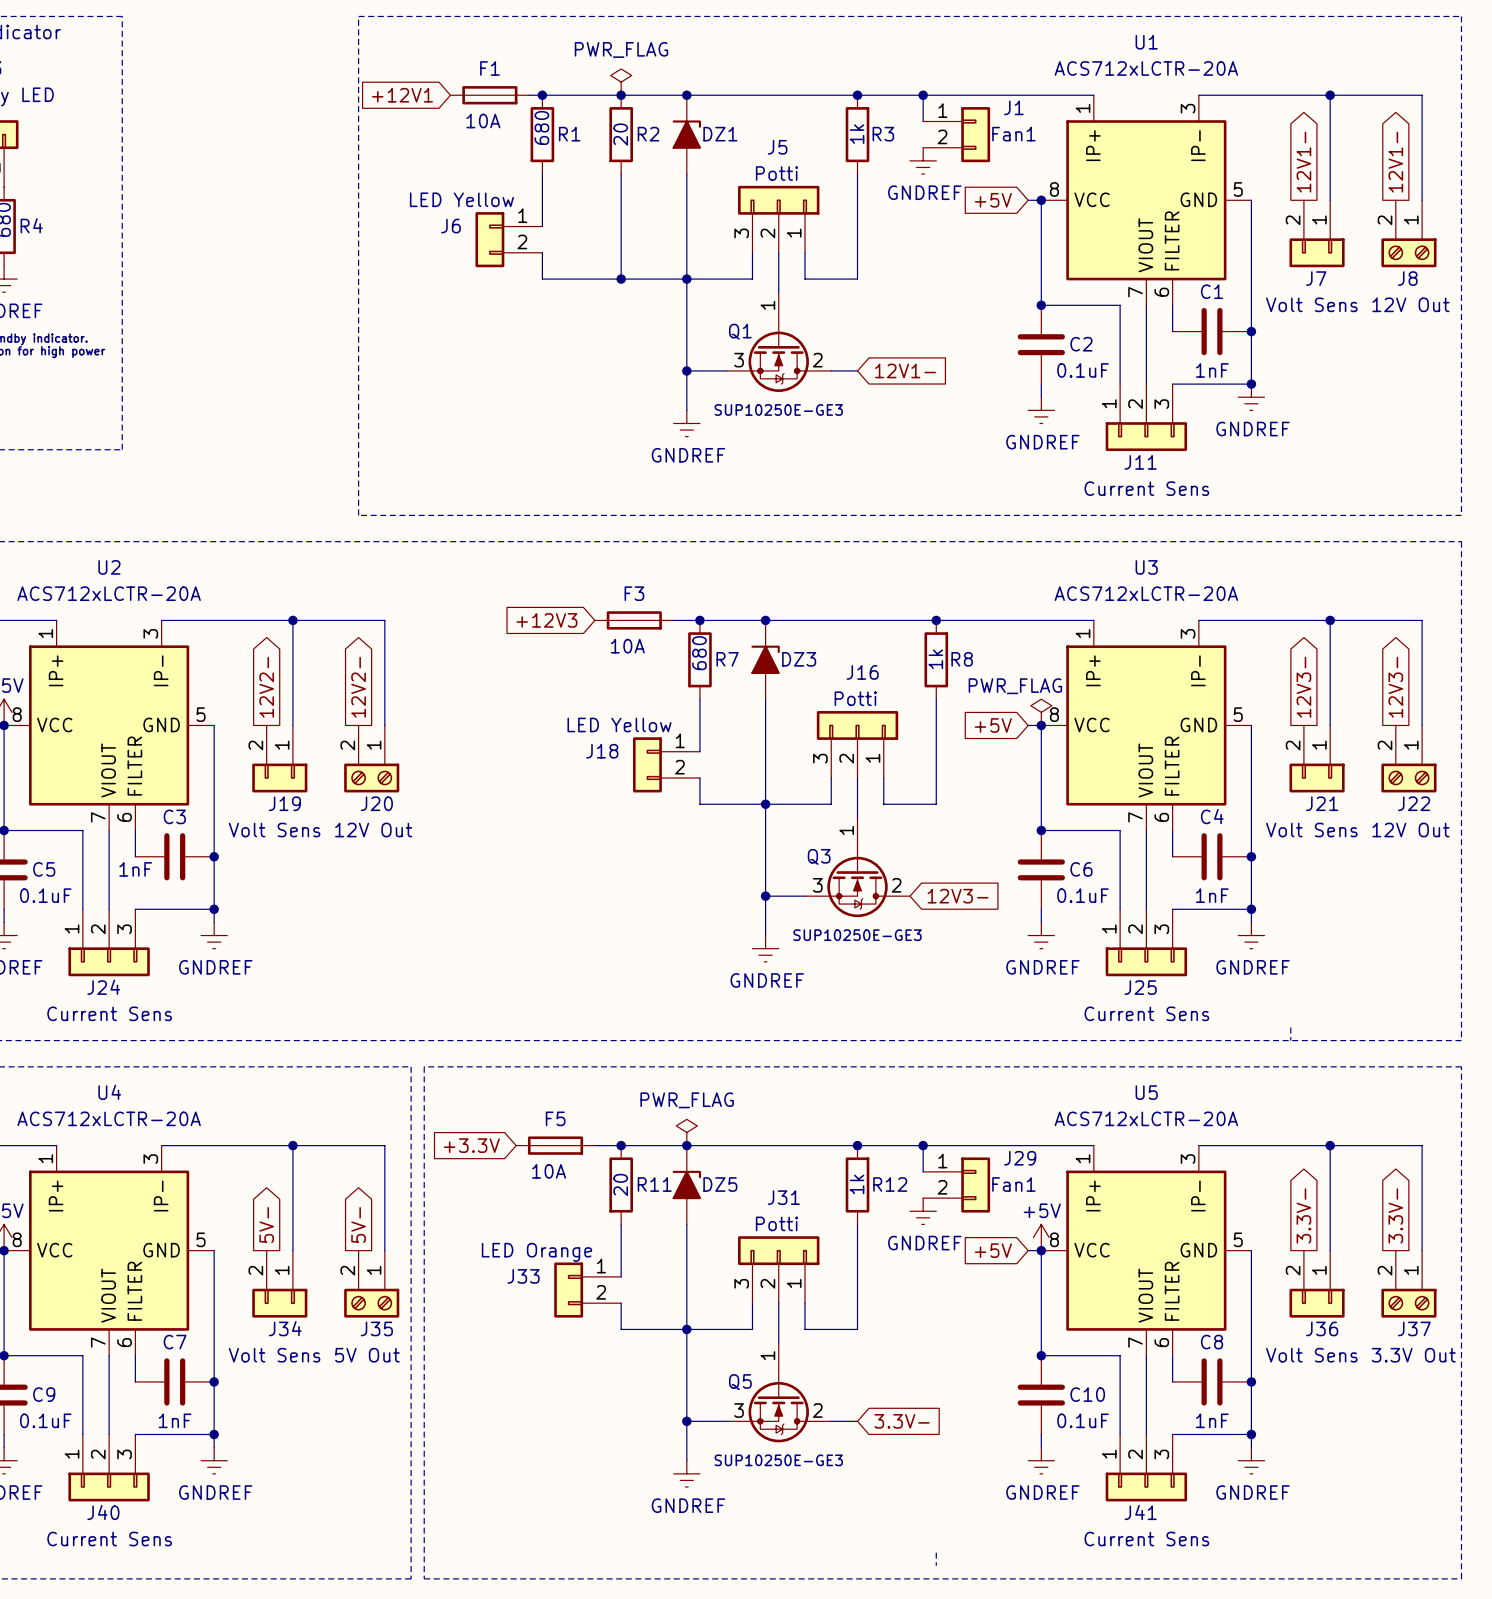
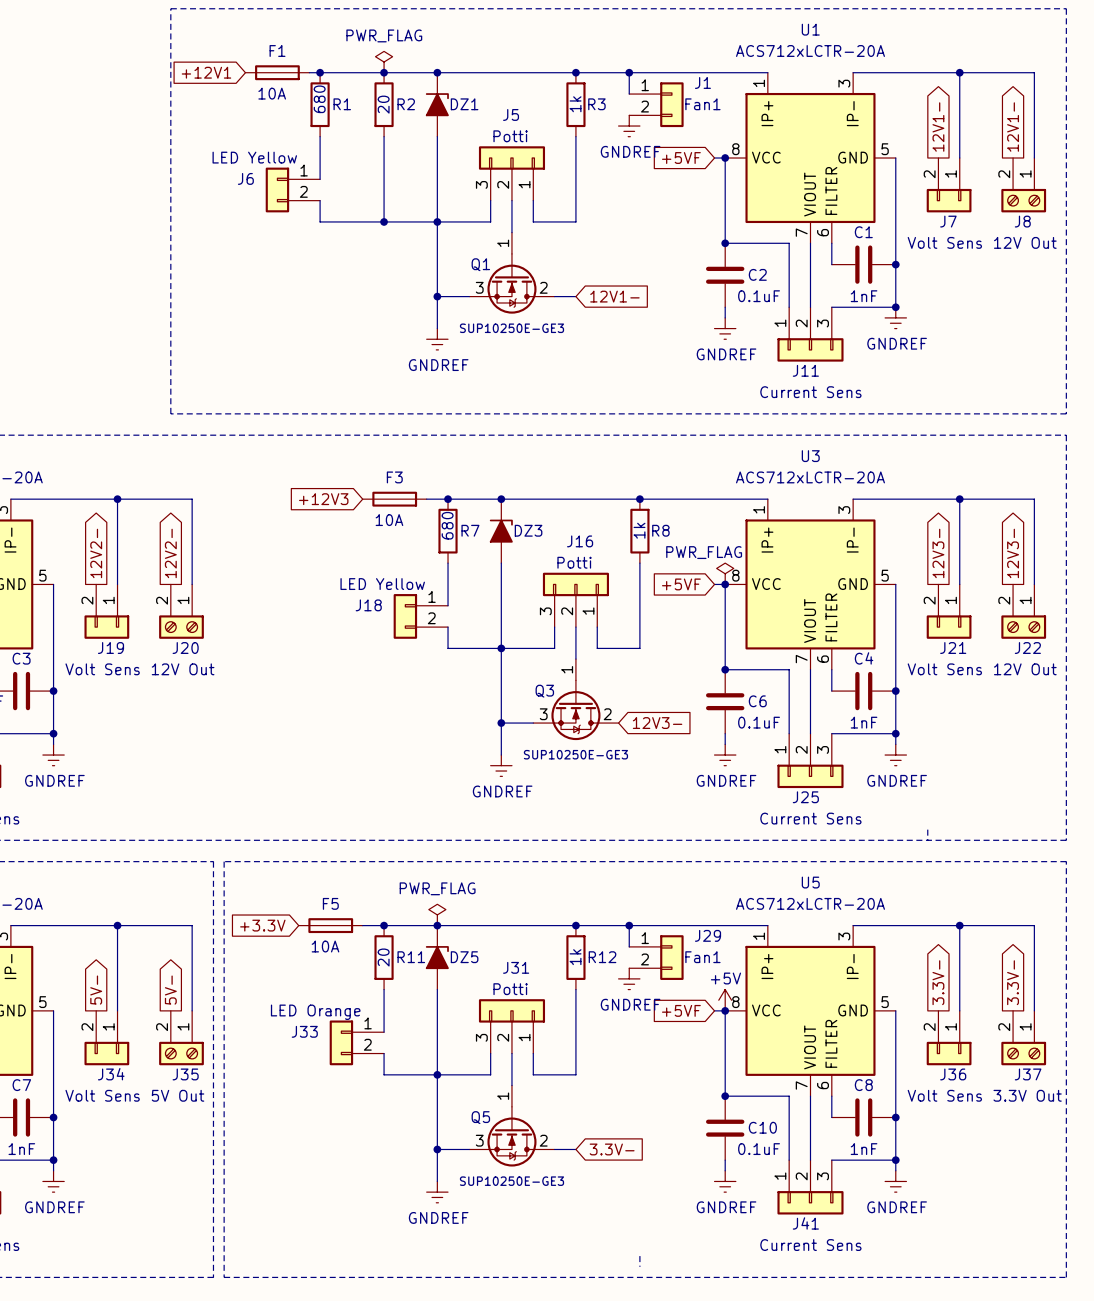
global label: +5V (993, 200) -> +5VF (681, 158)
global label: +5V (993, 725) -> +5VF (681, 584)
global label: +5V (993, 1250) -> +5VF (681, 1010)

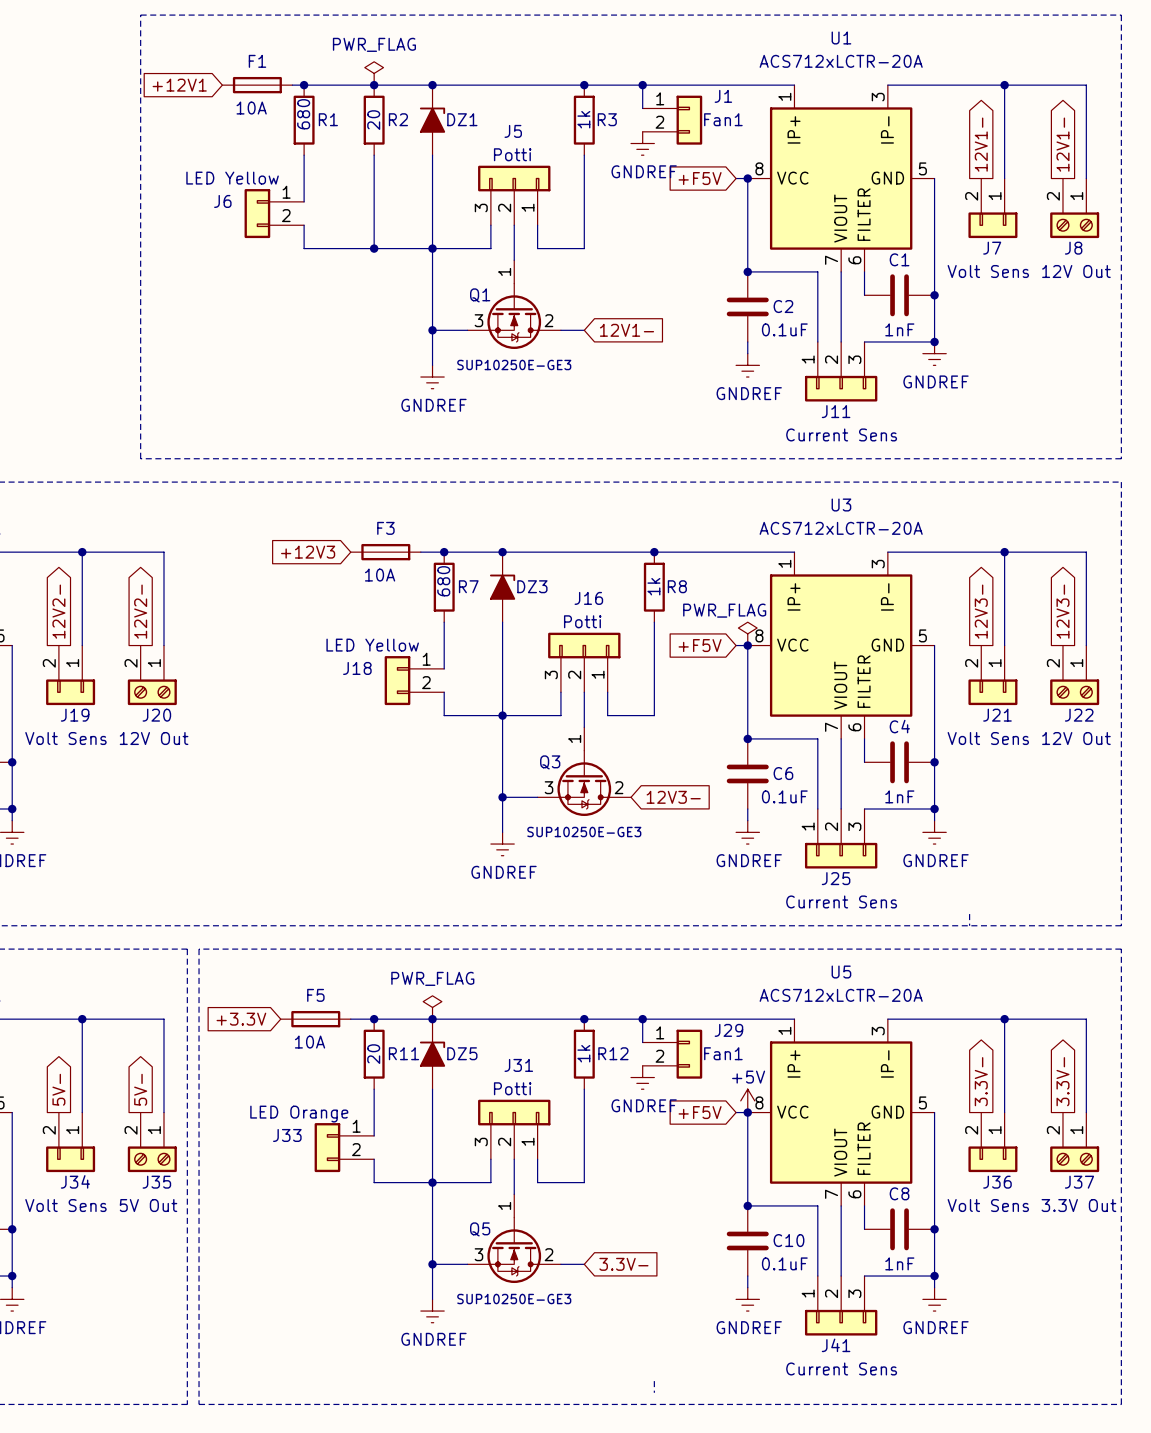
global label: +5VF (681, 158) -> +F5V (700, 178)
global label: +5VF (681, 584) -> +F5V (700, 645)
global label: +5VF (681, 1010) -> +F5V (700, 1112)

